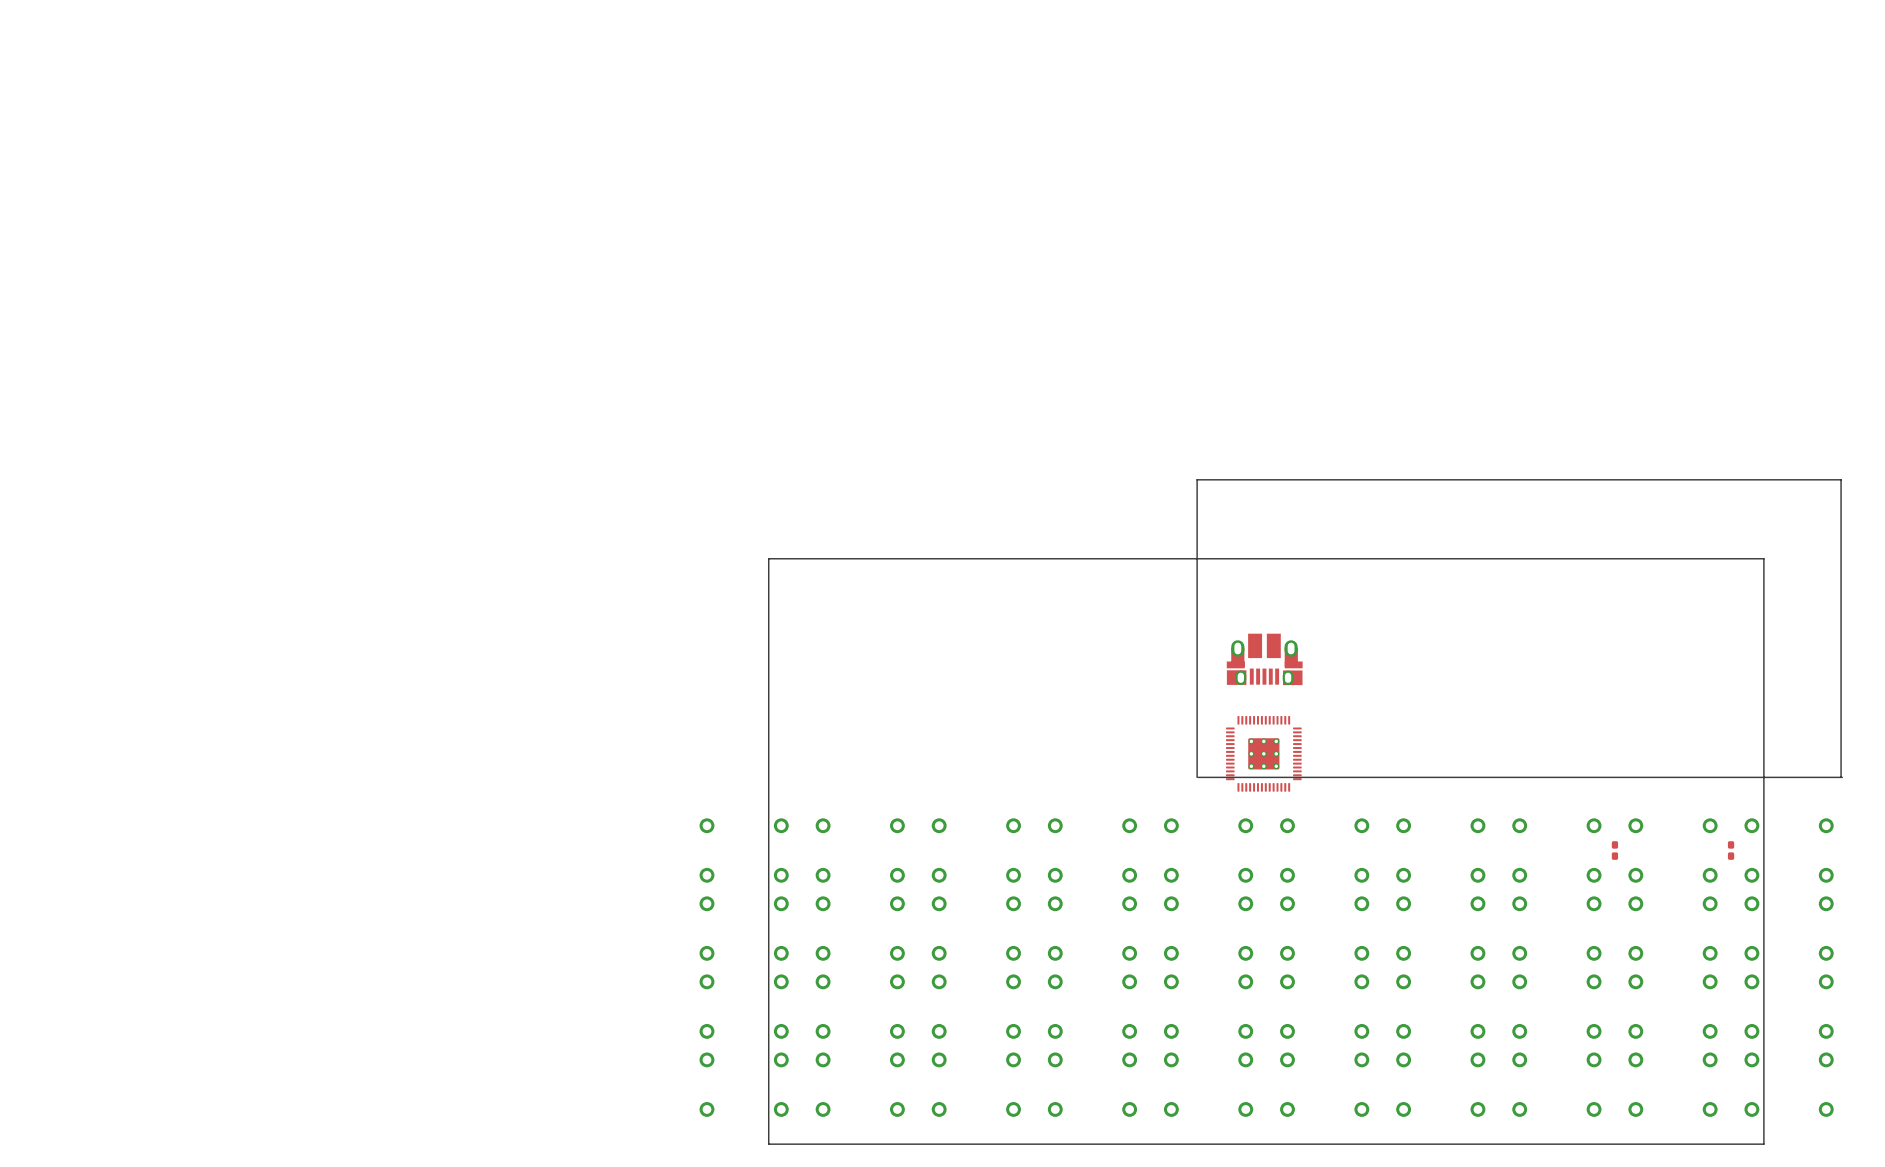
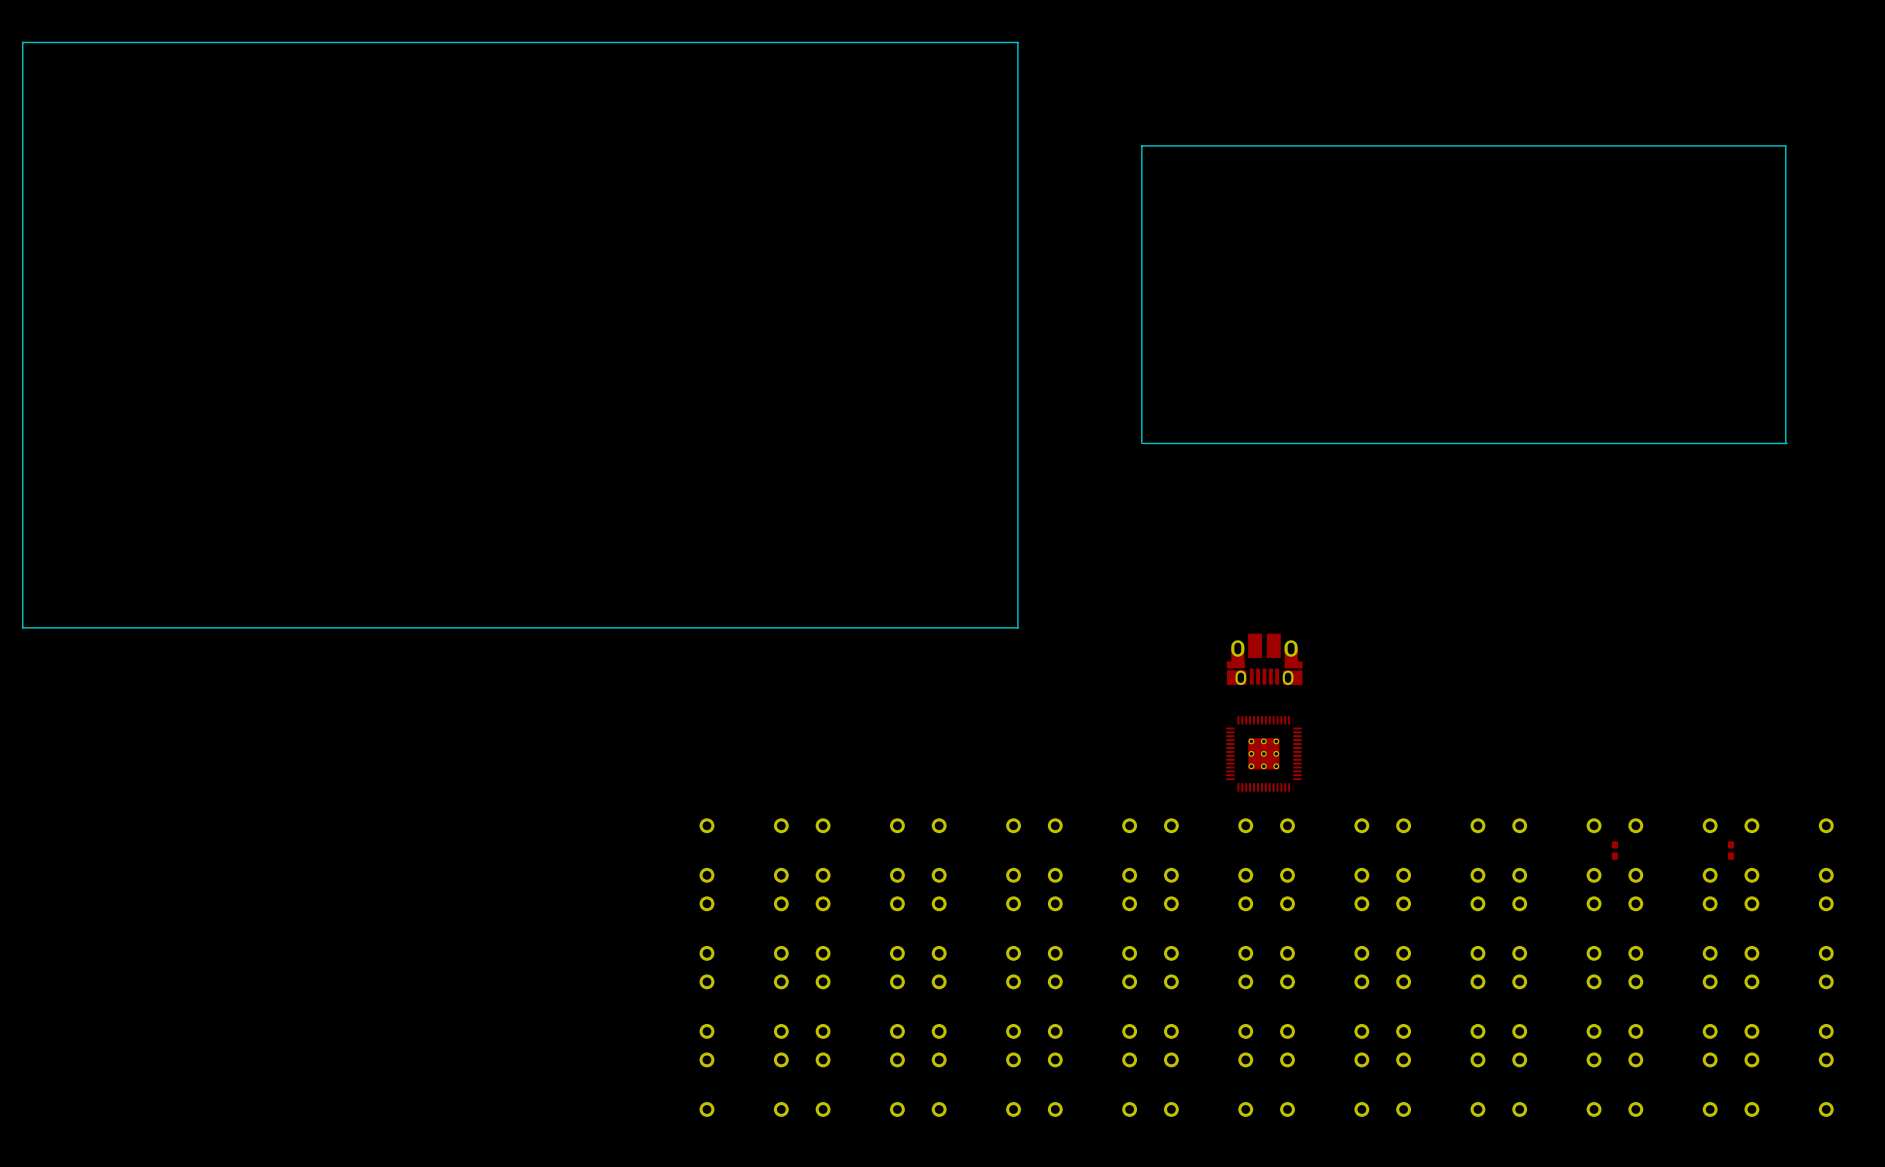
line: none -> (1017, 42) (1017, 627) (22, 627) (22, 42) (1017, 42)
line: none -> (1785, 443) (1785, 145) (1141, 145) (1141, 443)
line: none -> (1787, 443) (1143, 443)
line: (1763, 558) (1763, 1144) (768, 1144) (768, 558) (1763, 558) -> none
line: (1841, 777) (1841, 479) (1197, 479) (1197, 777) -> none
line: (1842, 777) (1198, 777) -> none

